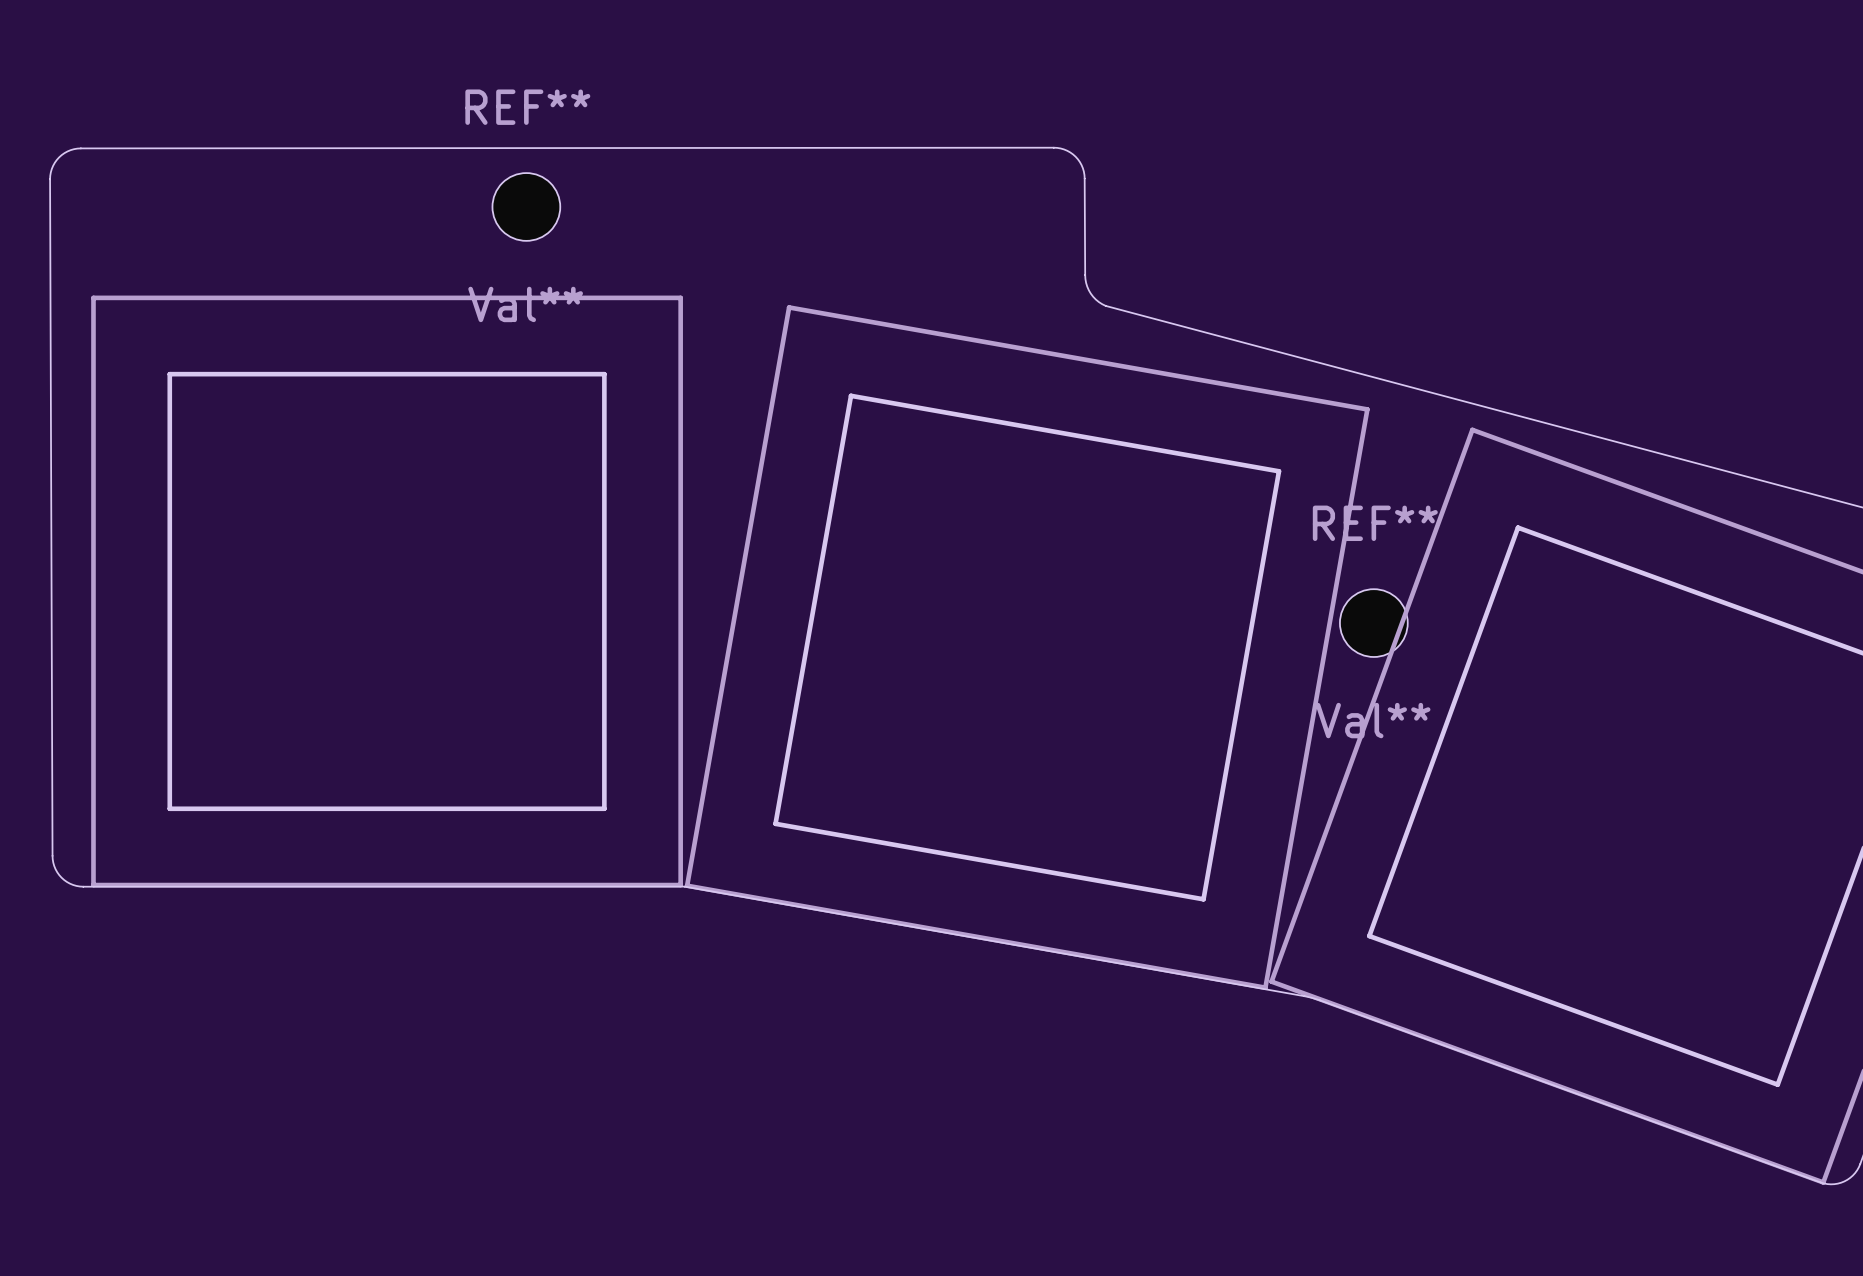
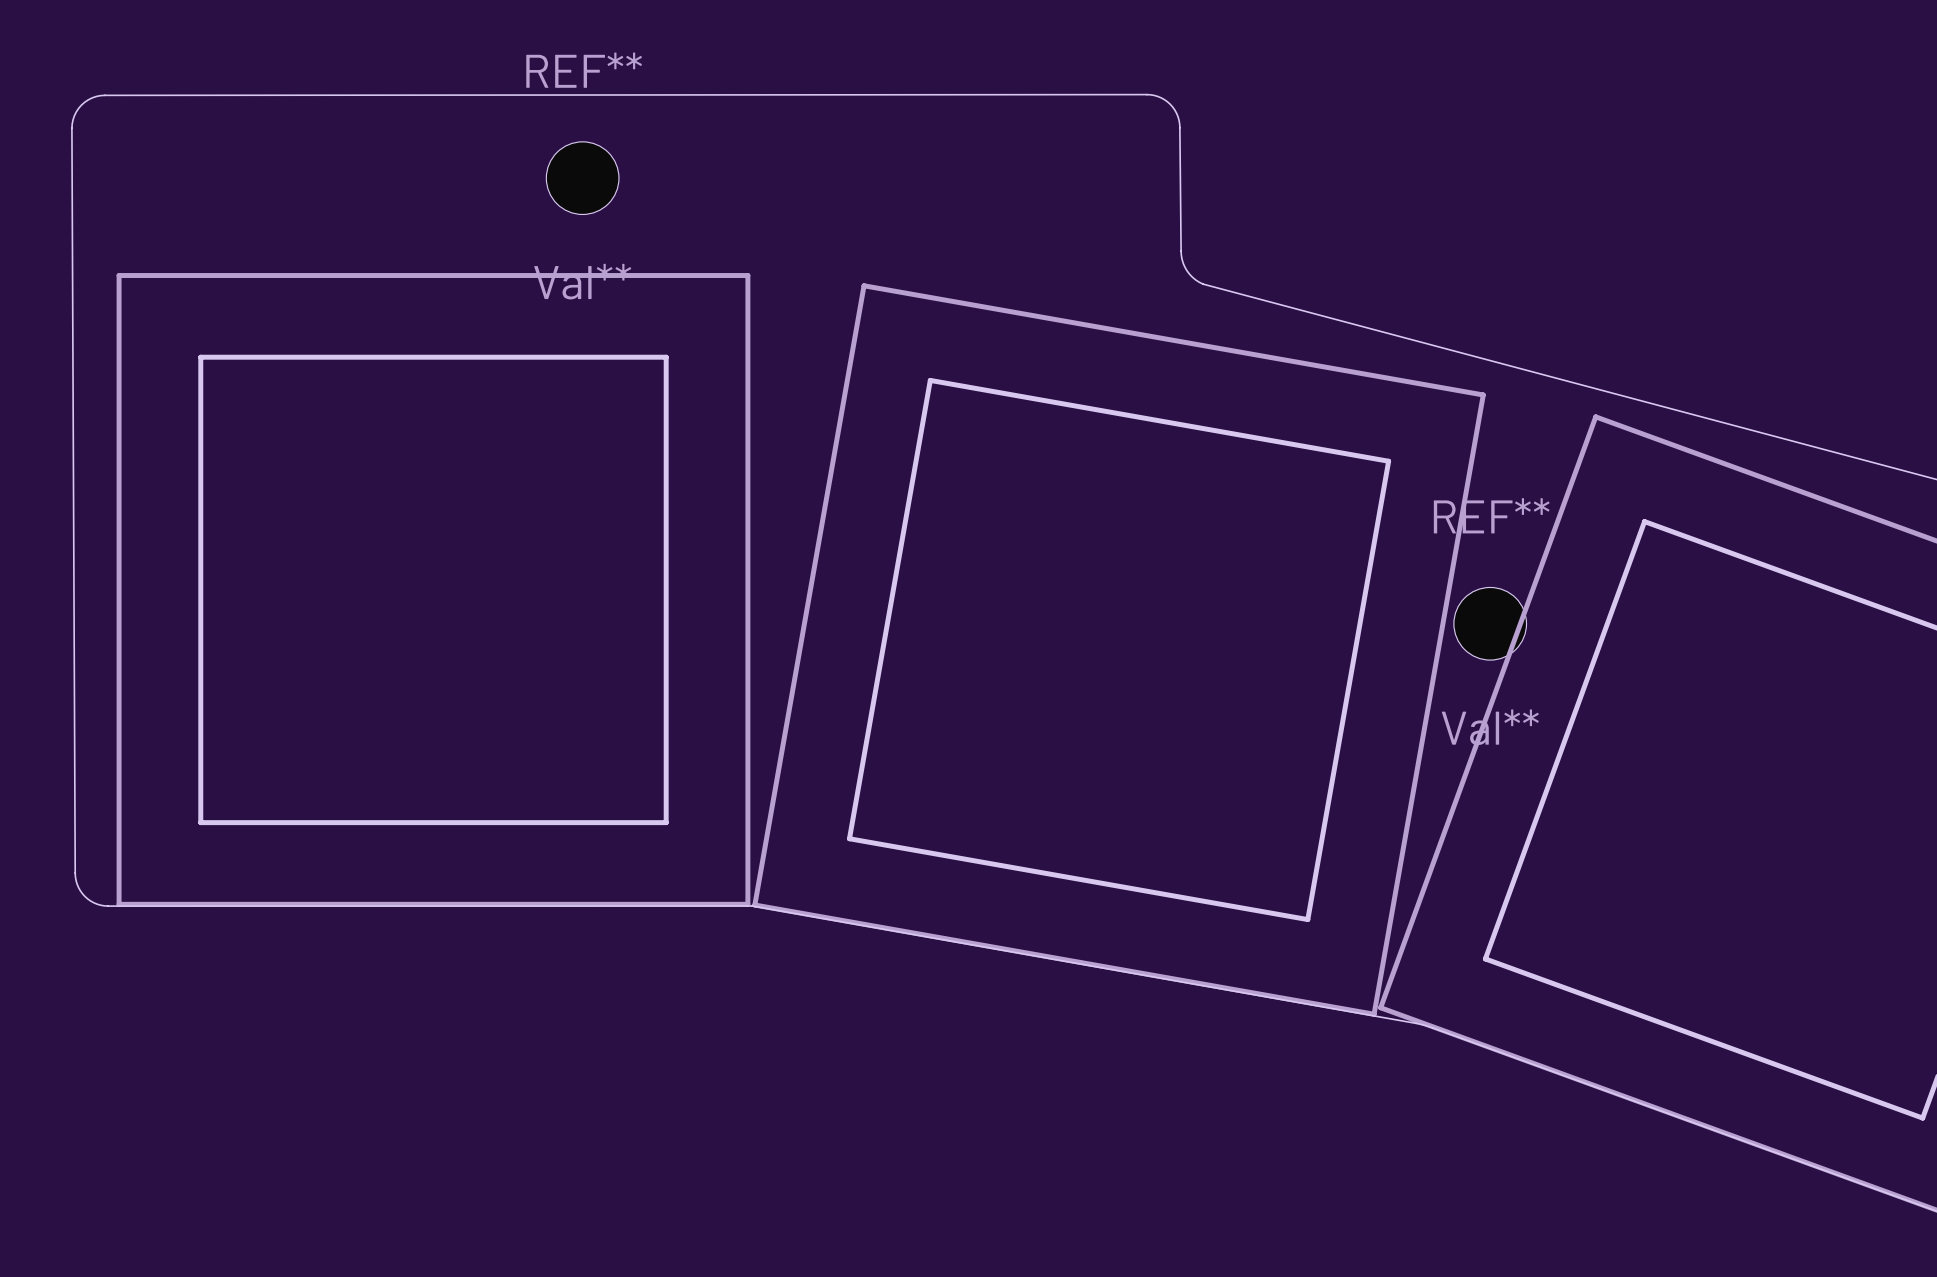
board edge: (1085, 275) (1083, 171) (1079, 162) (1073, 154) (1057, 147) (80, 148) (64, 153) (54, 162) (50, 179) (52, 855) -> (1181, 251) (1179, 120) (1170, 104) (1161, 97) (1150, 94) (104, 95) (88, 99) (76, 111) (71, 128) (75, 873)

